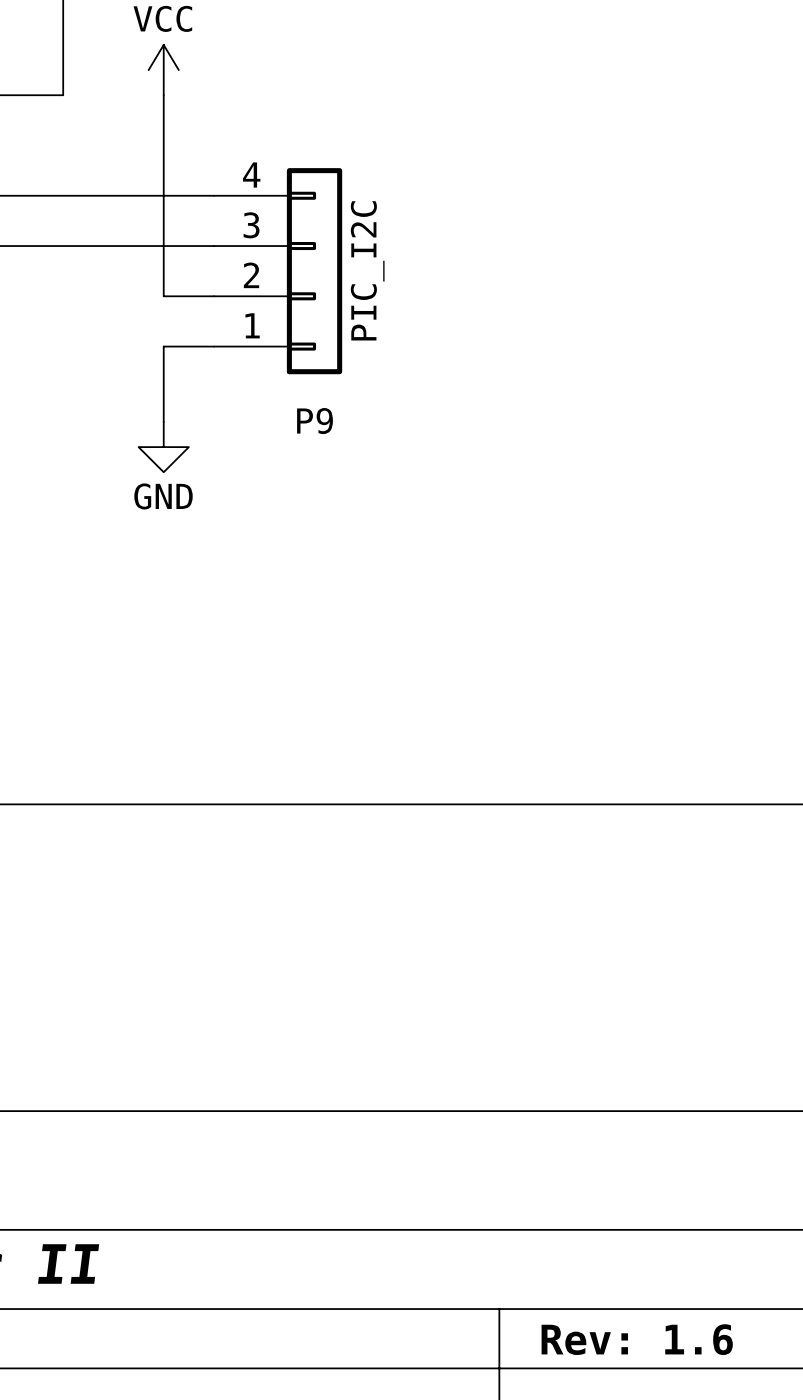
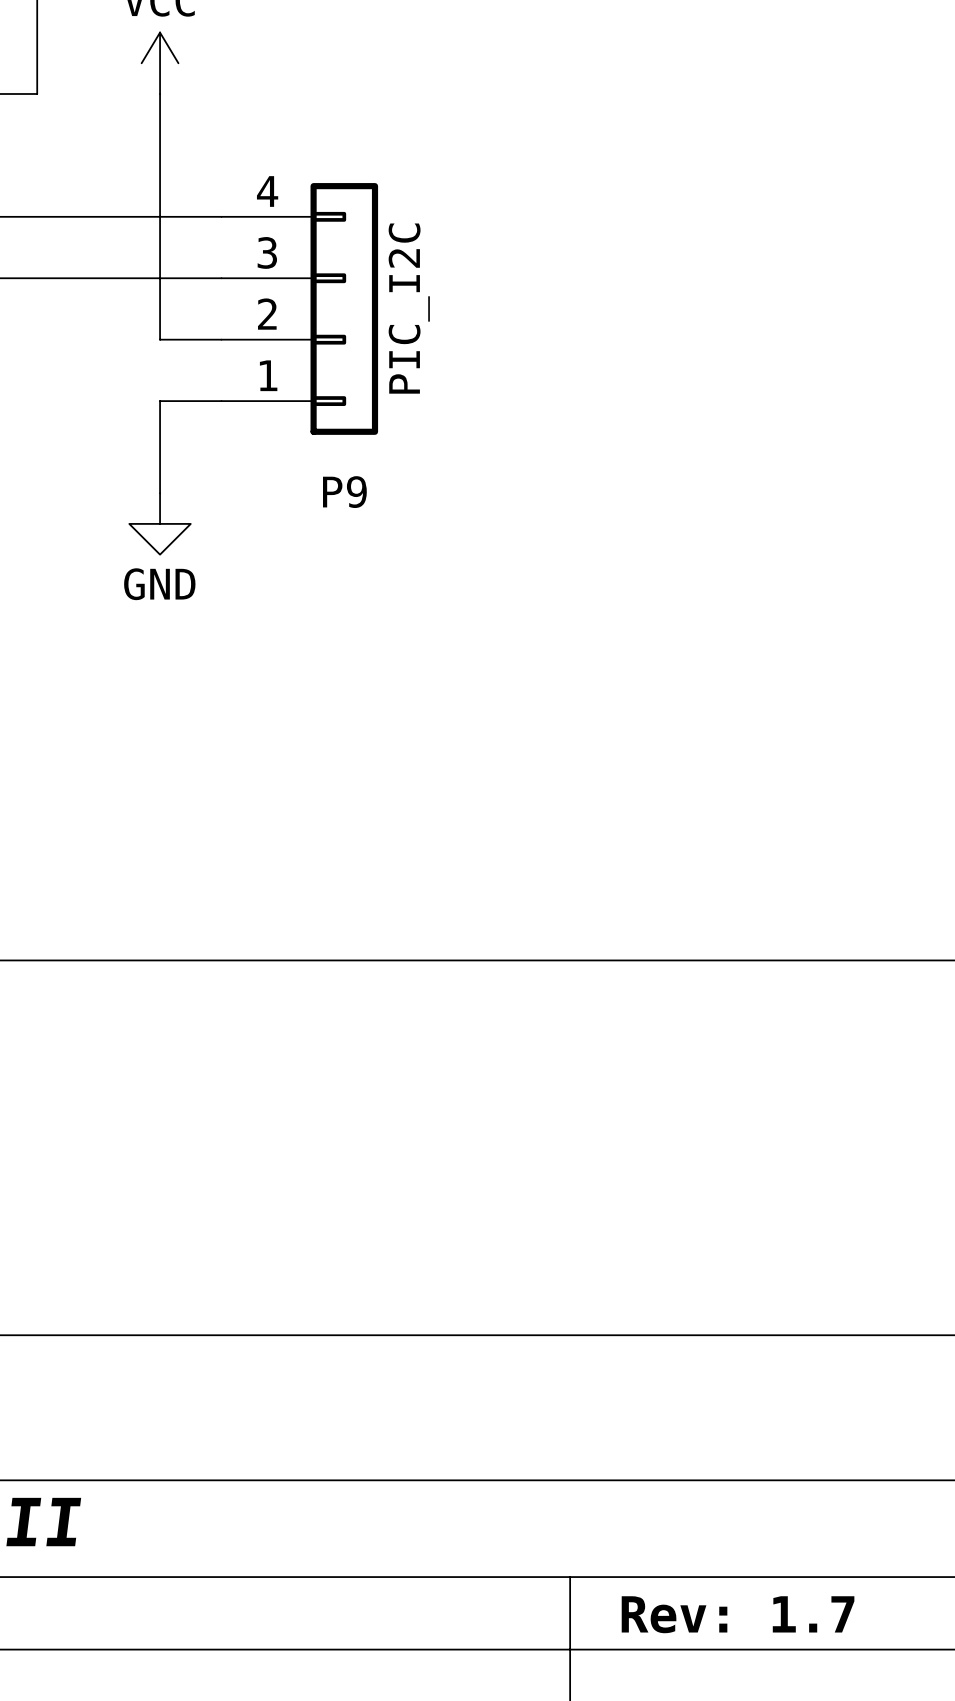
title block: Rev: 1.6 (637, 1339) -> Rev: 1.7 (738, 1614)

